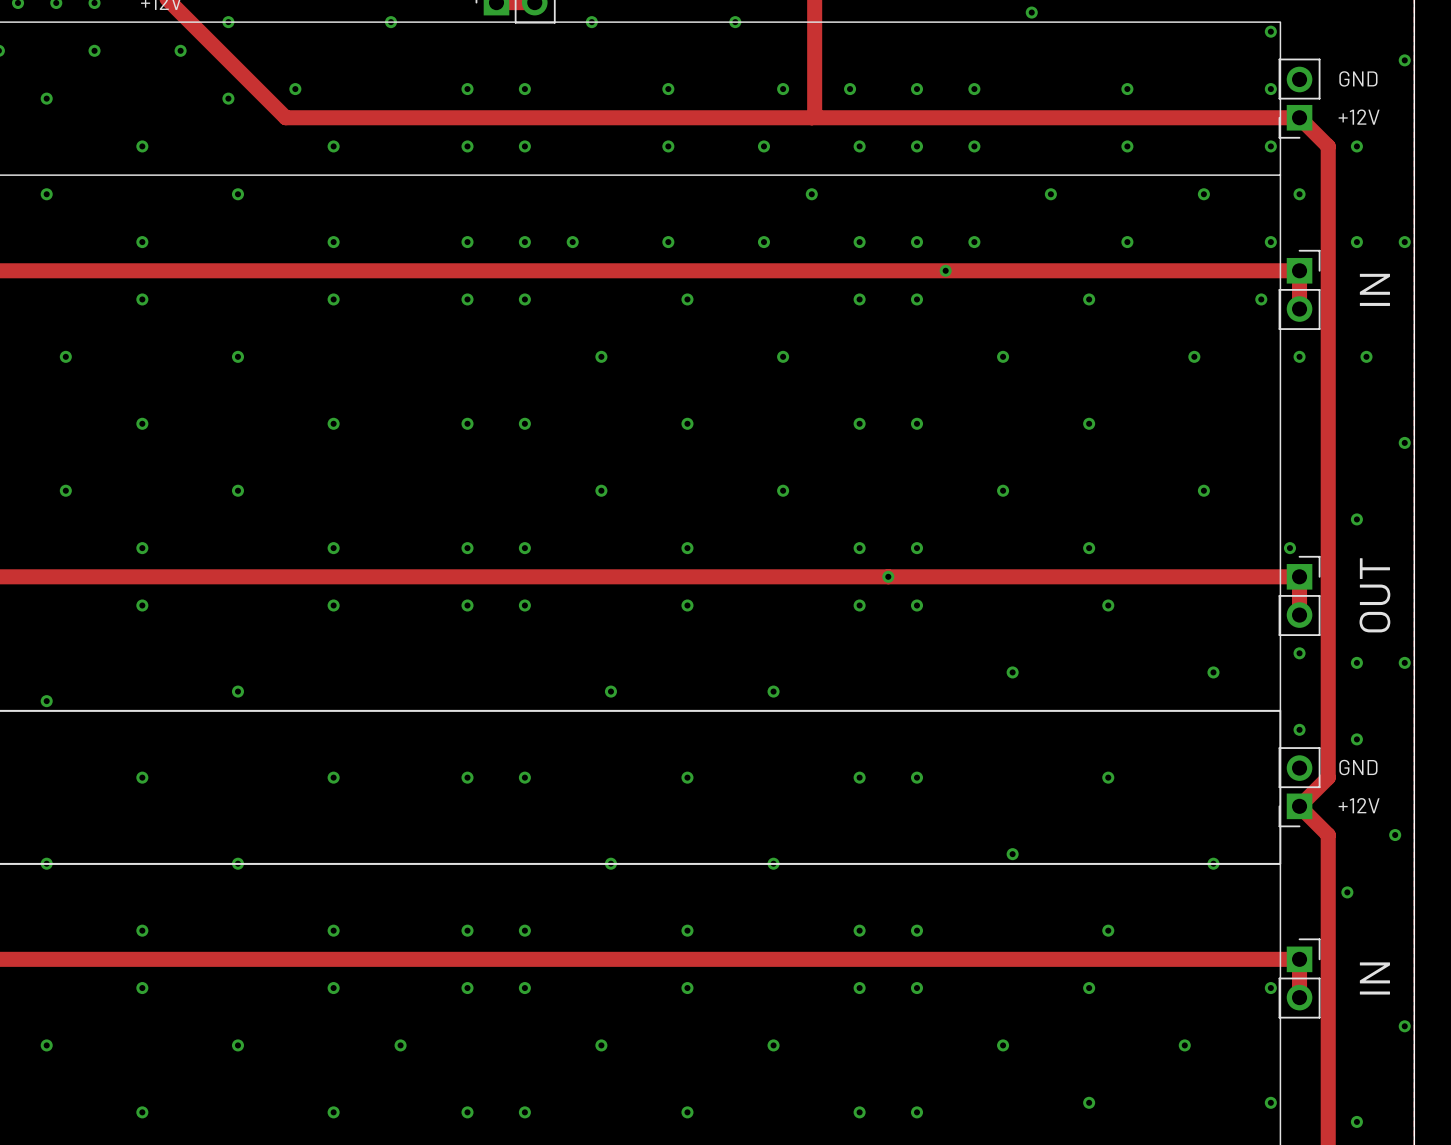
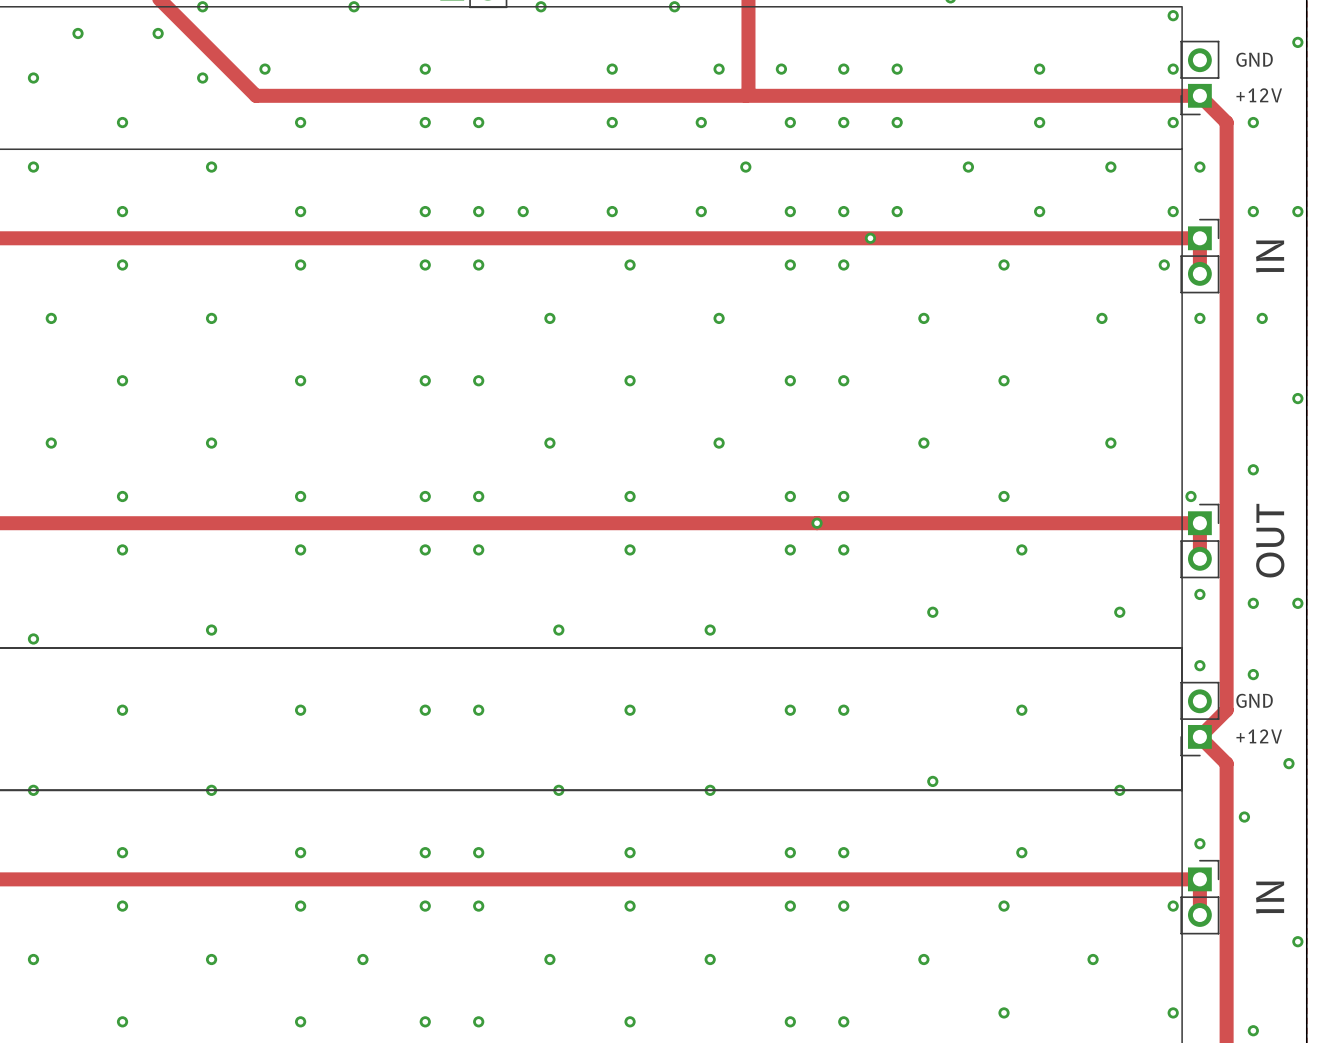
via: (524, 89) -> none
via: none -> (1199, 843)

